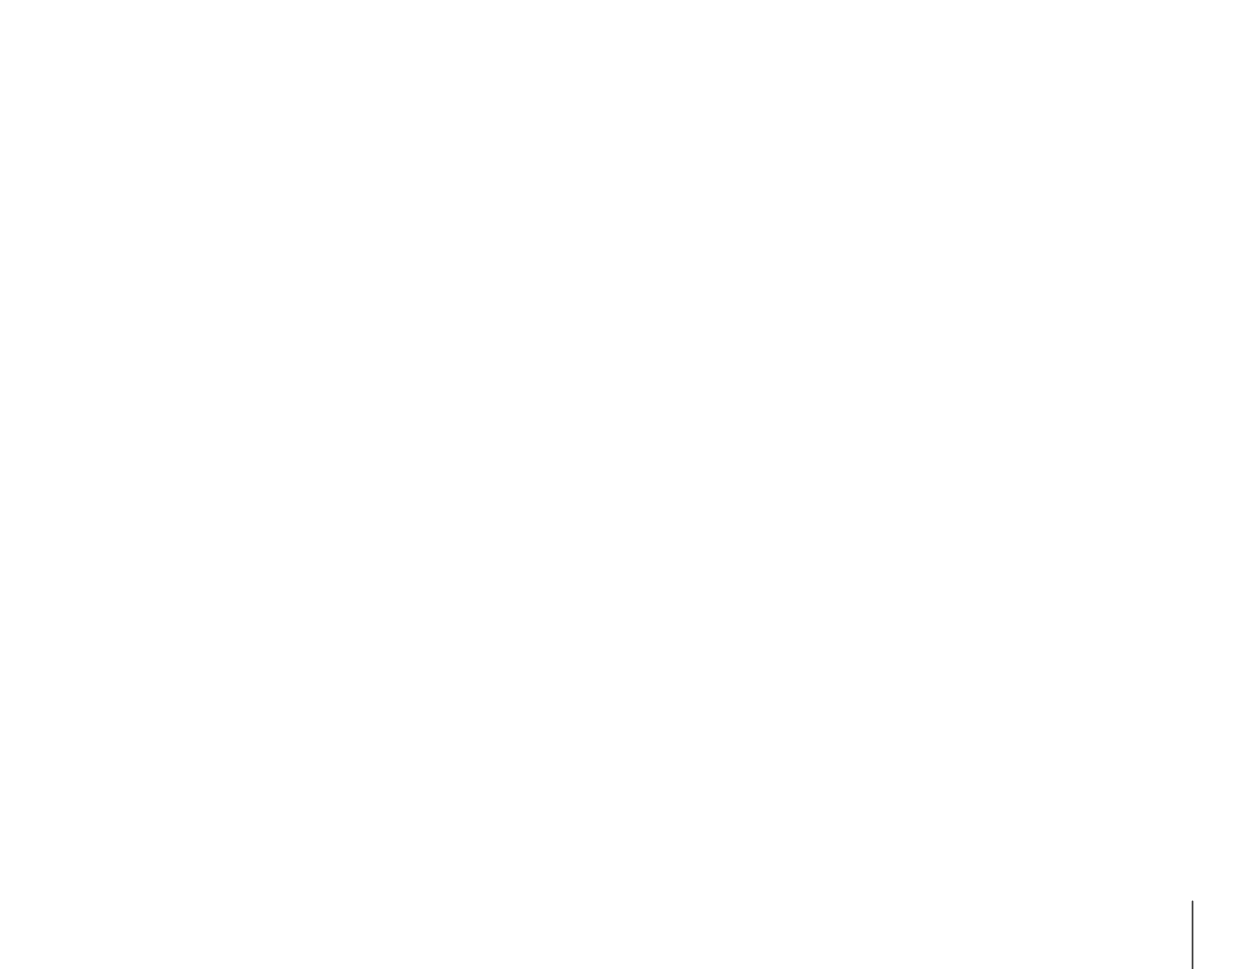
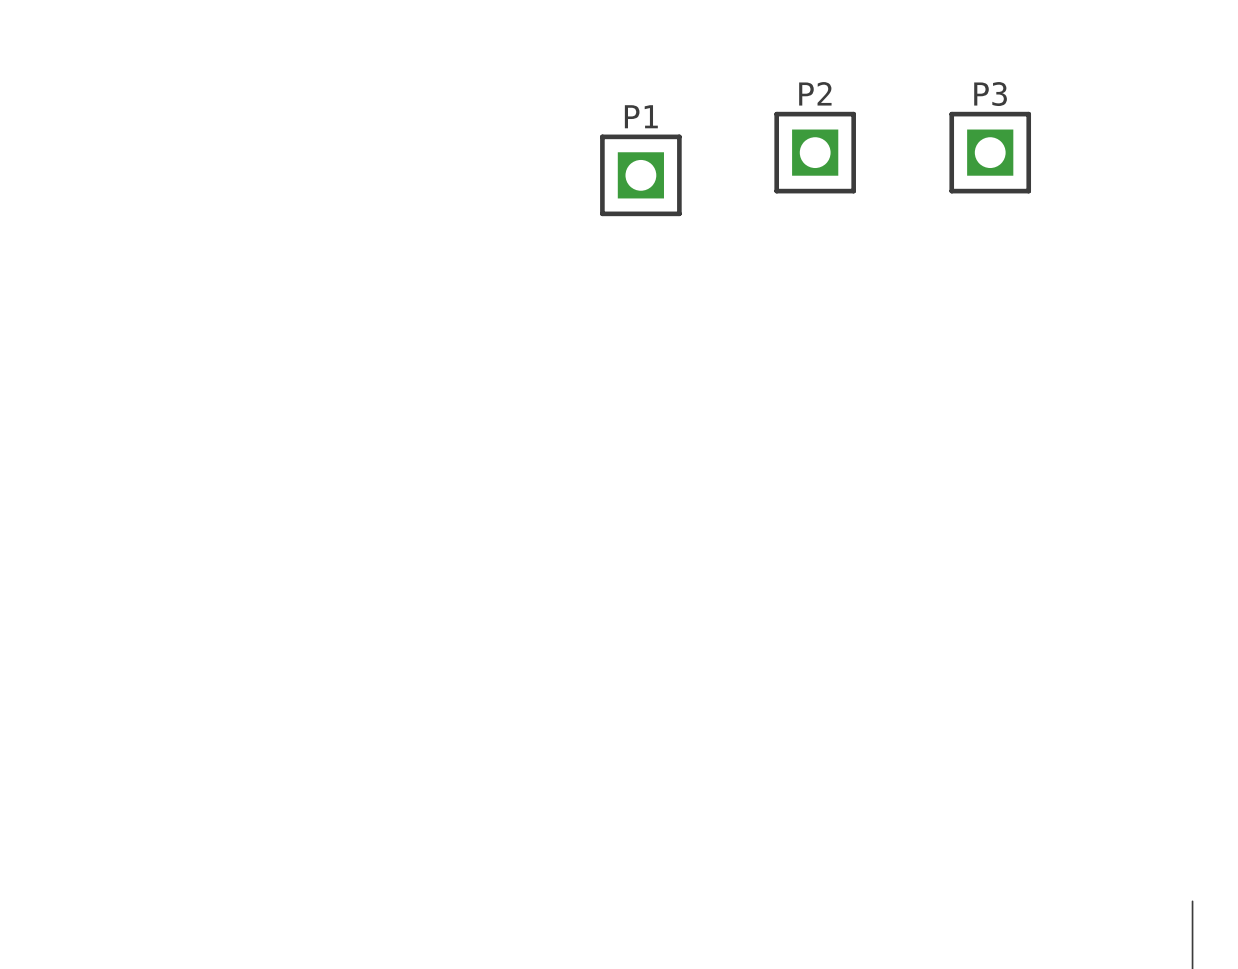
P2: none -> (815, 152)
P3: none -> (990, 152)
P1: none -> (640, 175)

